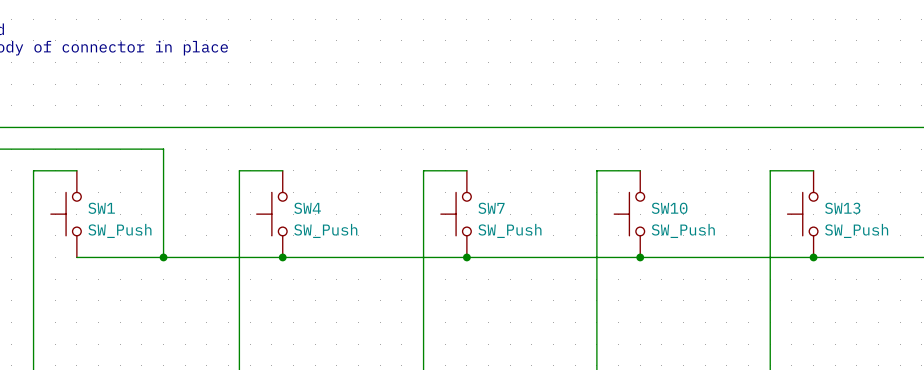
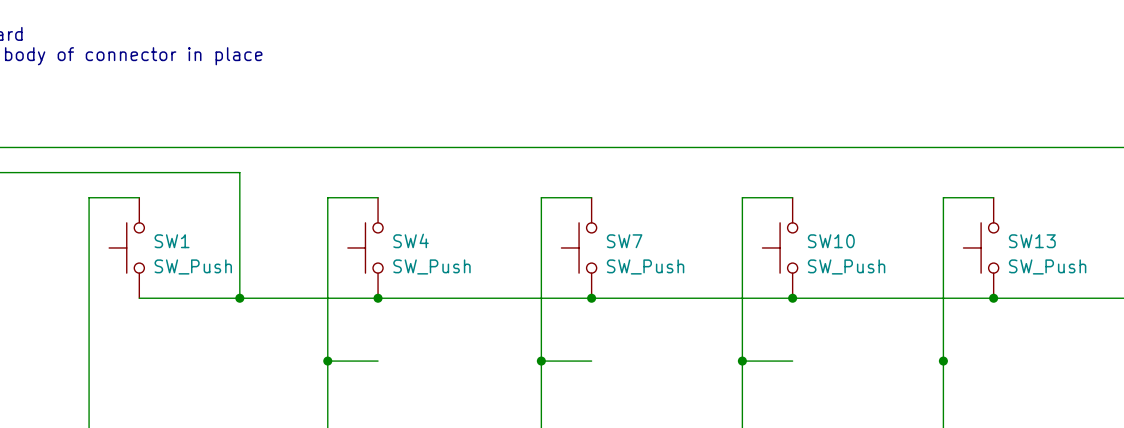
wire: none -> (327, 361) (378, 361)
junction: none -> (327, 361)
wire: none -> (541, 361) (591, 361)
junction: none -> (541, 361)
wire: none -> (742, 361) (792, 361)
junction: none -> (742, 361)
junction: none -> (943, 361)

